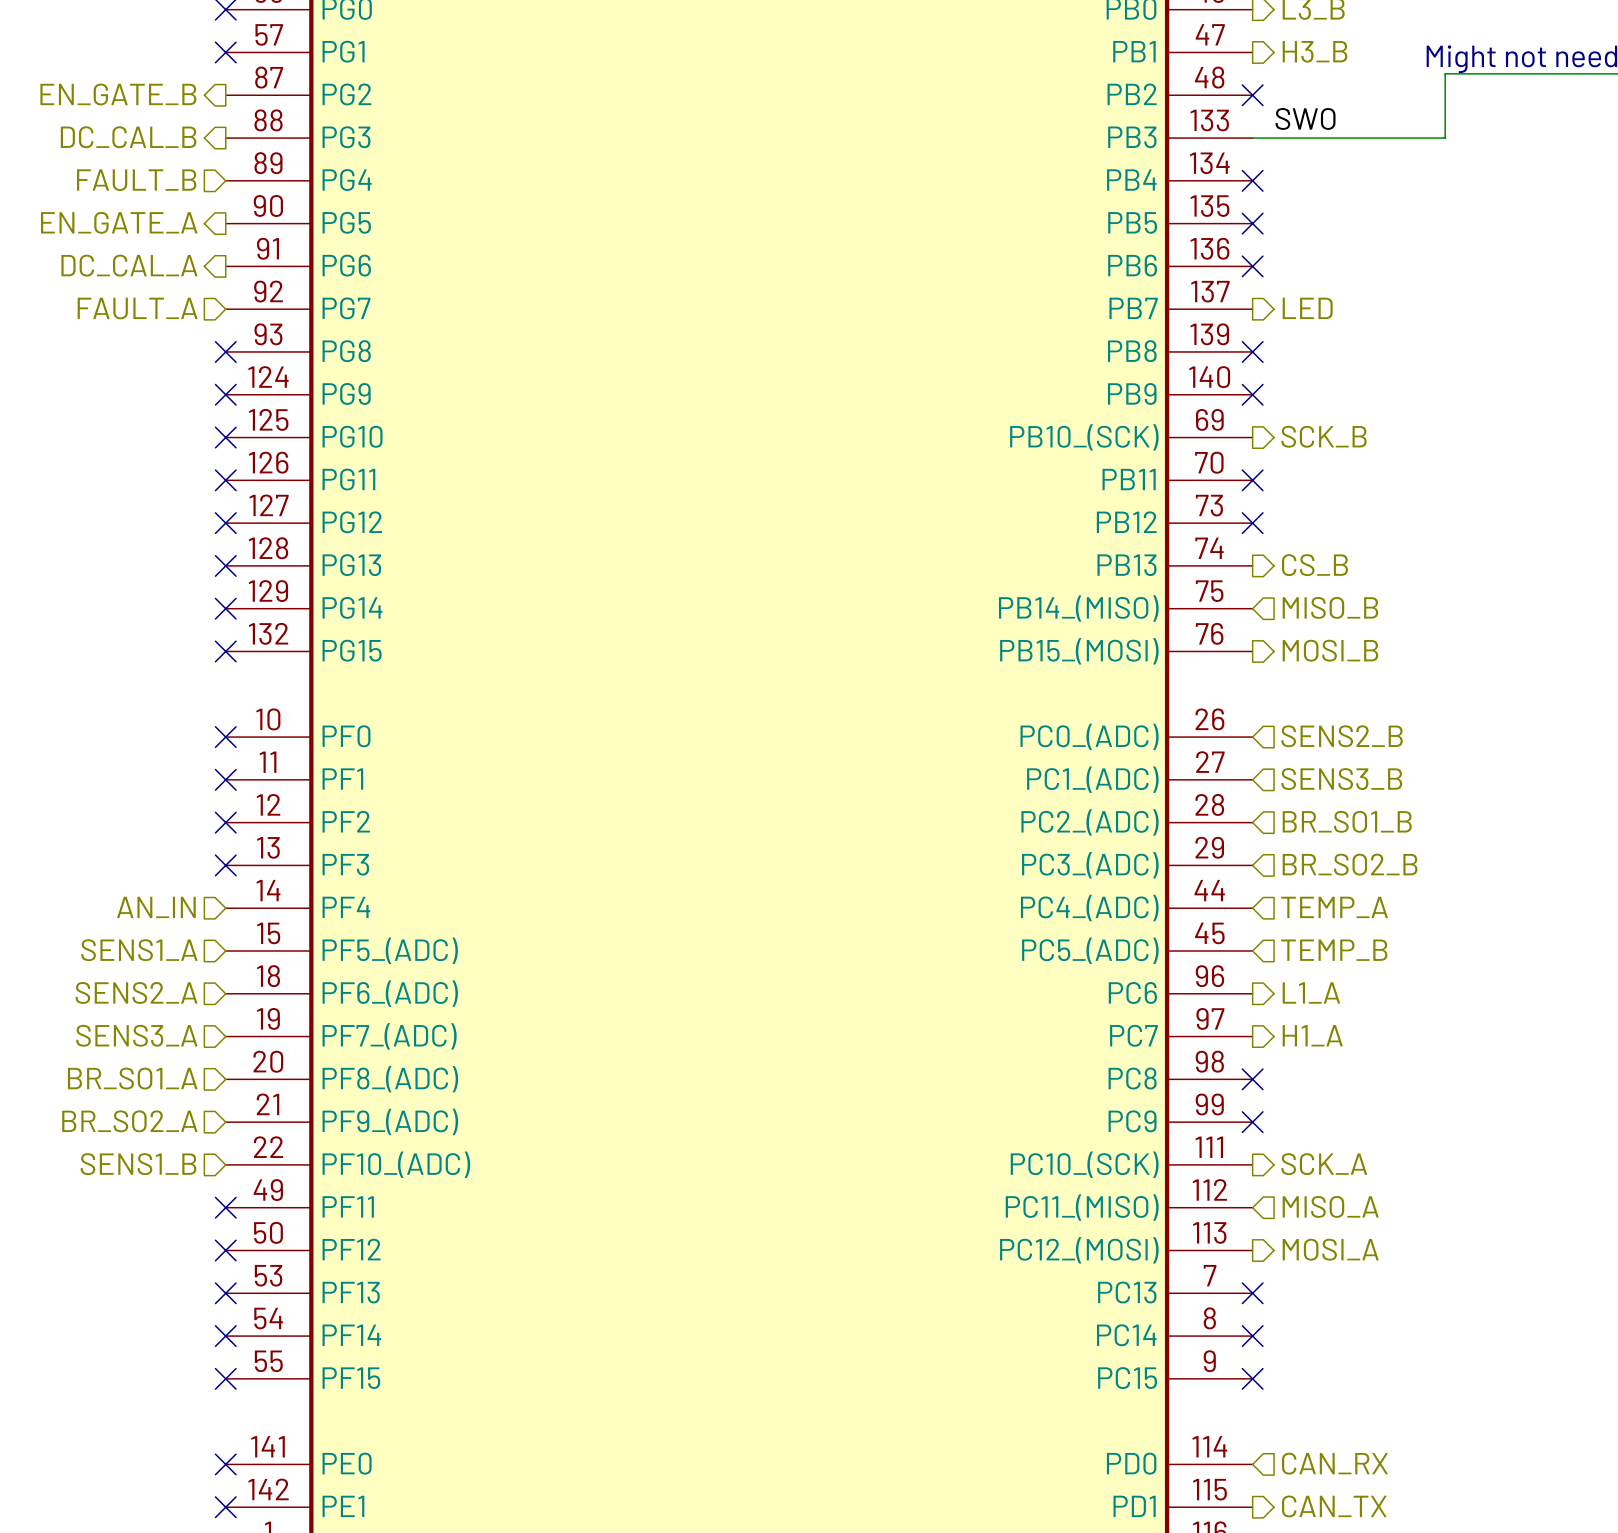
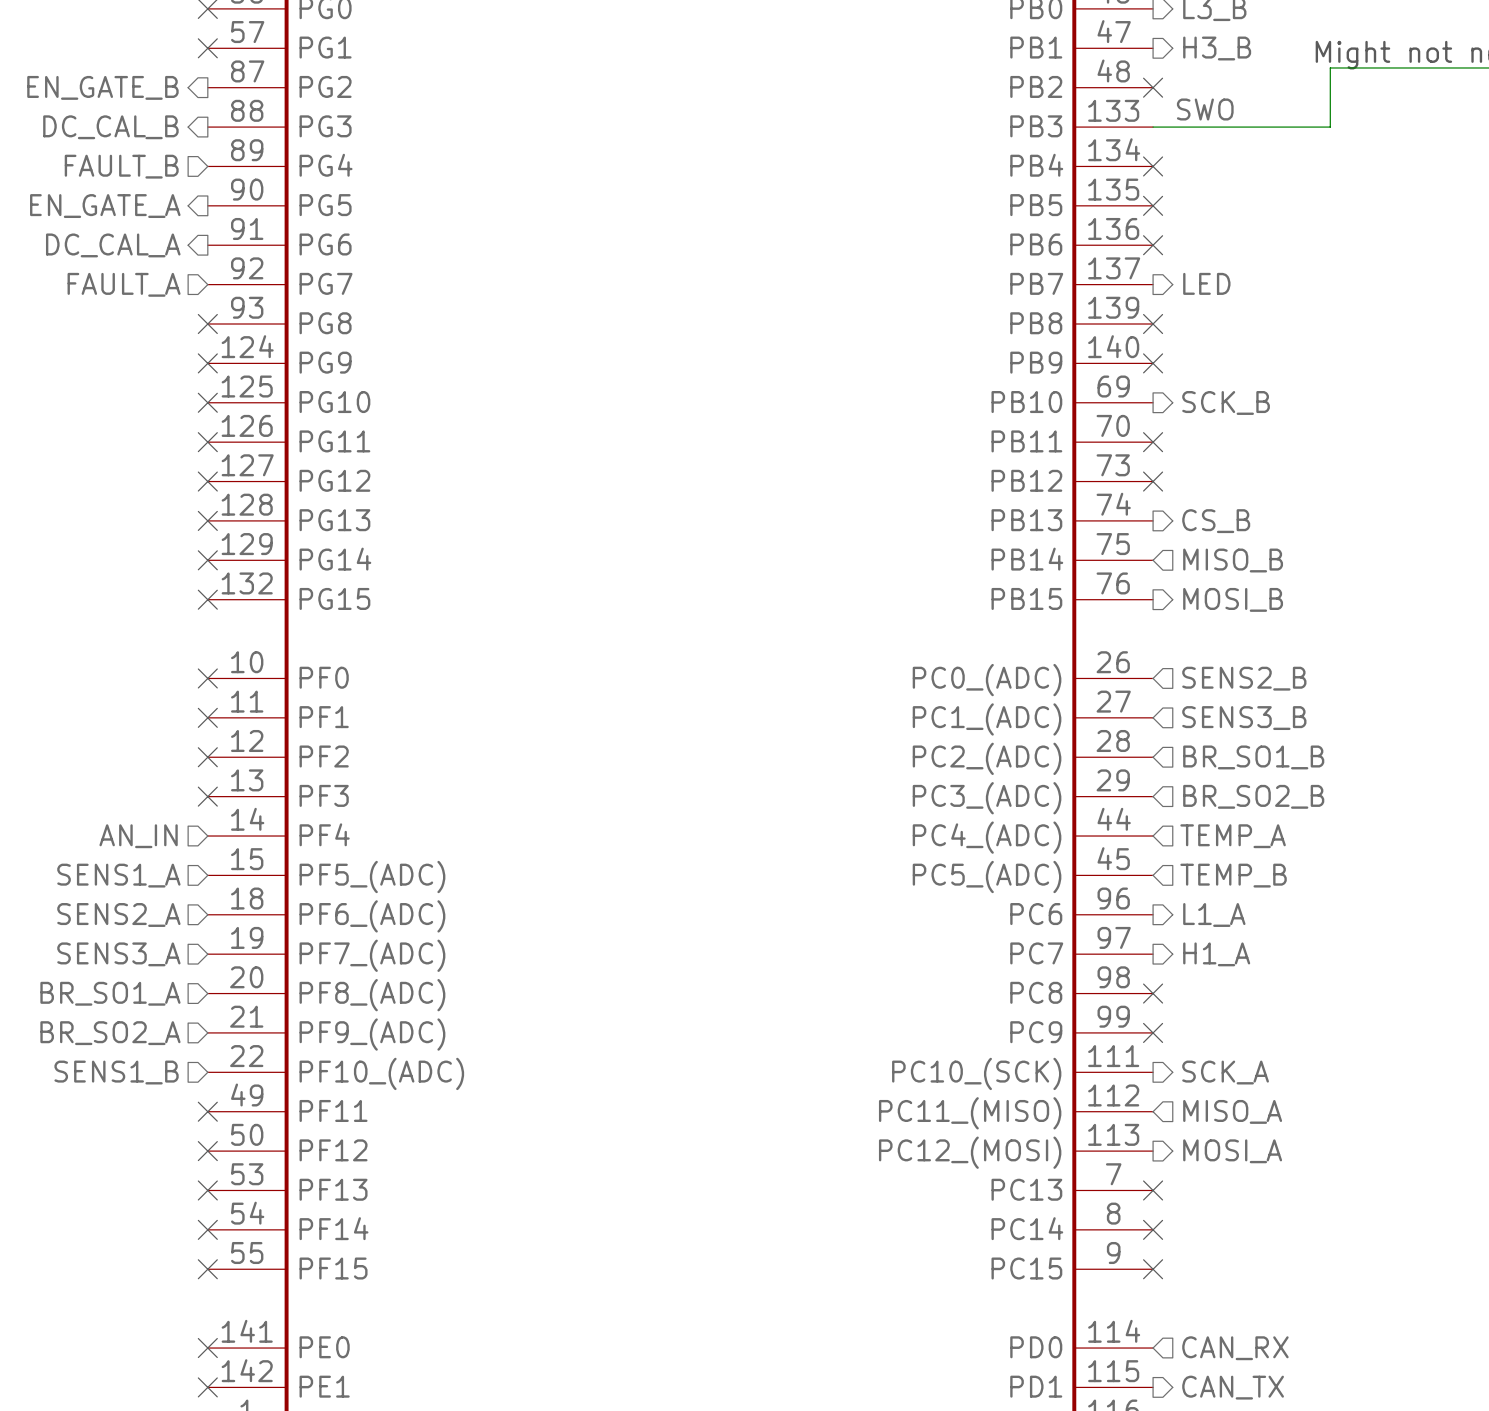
part pin name: PB10_(SCK) (1084, 437) -> PB10 (1026, 402)
part pin name: PB14_(MISO) (1078, 608) -> PB14 (1027, 559)
part pin name: PB15_(MOSI) (1079, 651) -> PB15 (1026, 598)

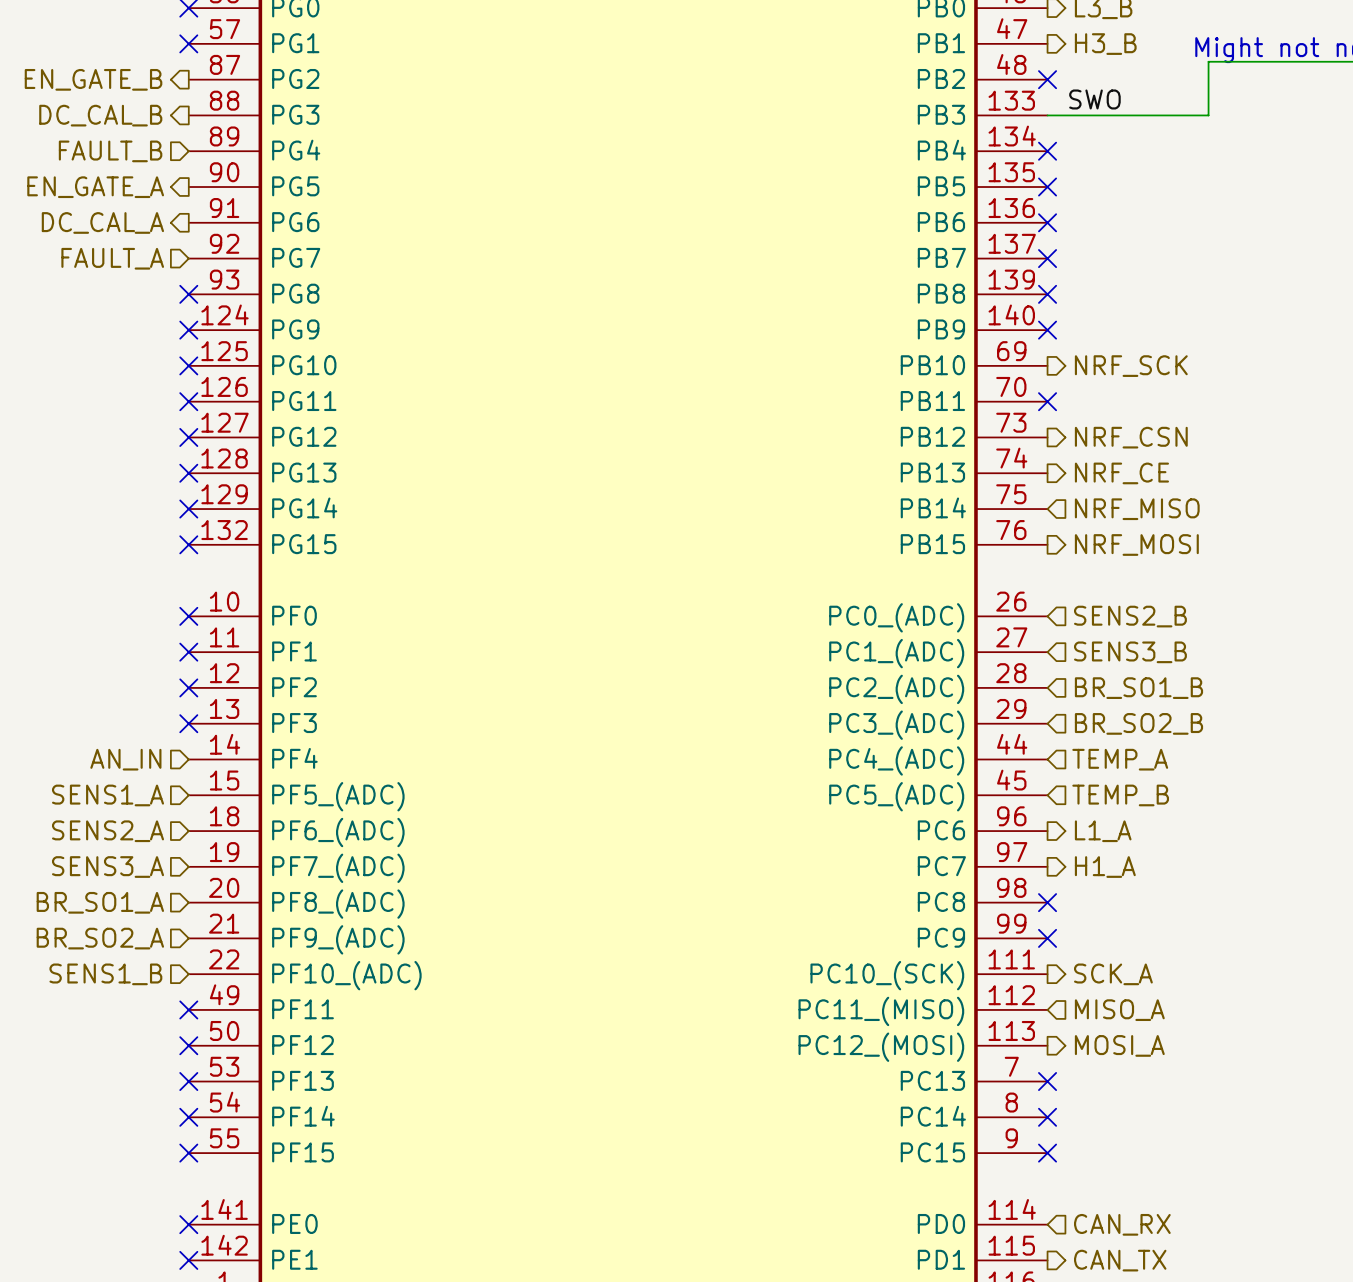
hierarchical label: LED (1206, 283) -> none
no-connect mark: none -> (1047, 258)
hierarchical label: SCK_B (1226, 402) -> NRF_SCK (1131, 366)
no-connect mark: (1153, 481) -> none
hierarchical label: none -> NRF_CSN (1131, 437)
hierarchical label: CS_B (1216, 521) -> NRF_CE (1121, 473)
hierarchical label: MISO_B (1233, 560) -> NRF_MISO (1137, 509)
hierarchical label: MOSI_B (1233, 599) -> NRF_MOSI (1136, 544)

